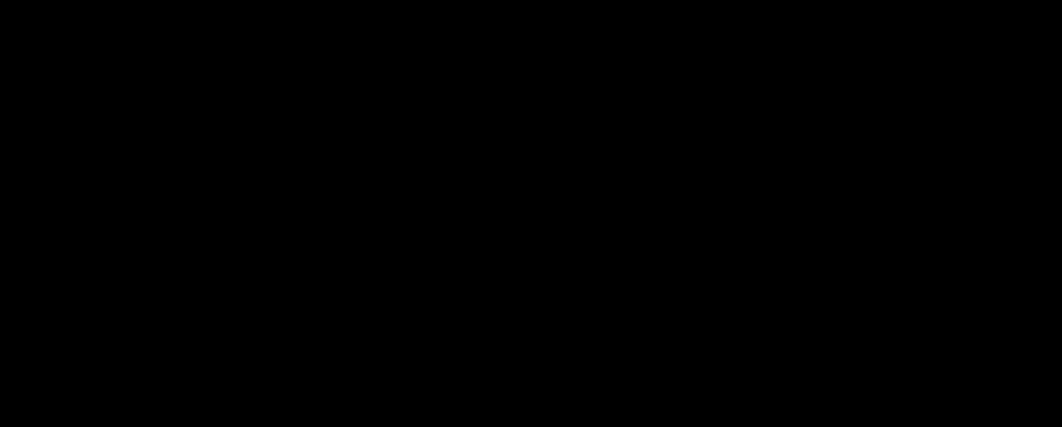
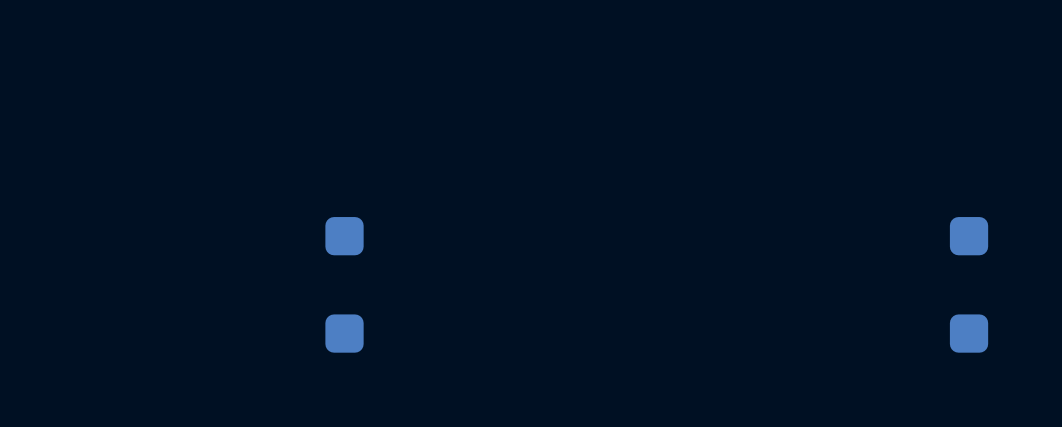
part: none -> (344, 284)
part: none -> (969, 284)

